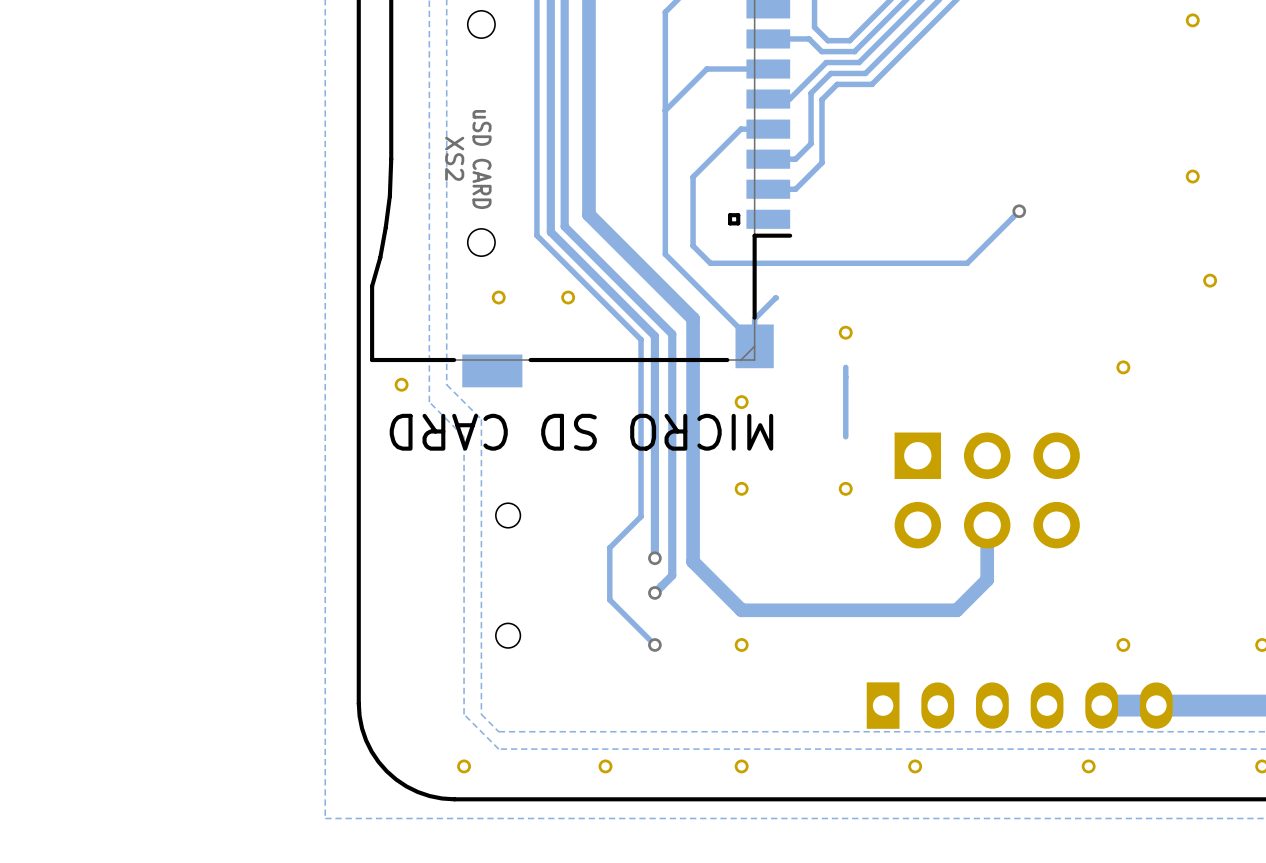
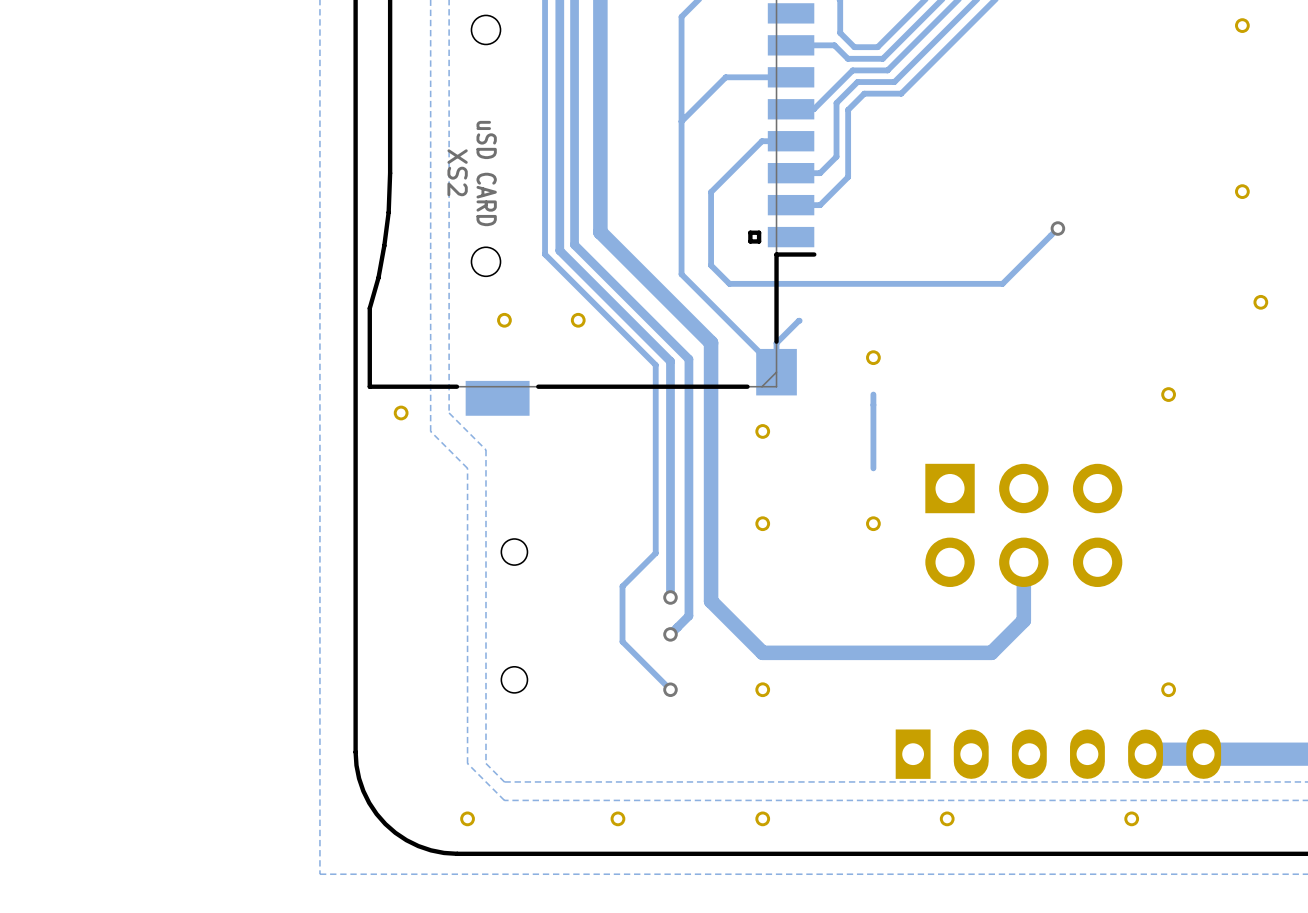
text: MICRO SD CARD (581, 432) -> none

